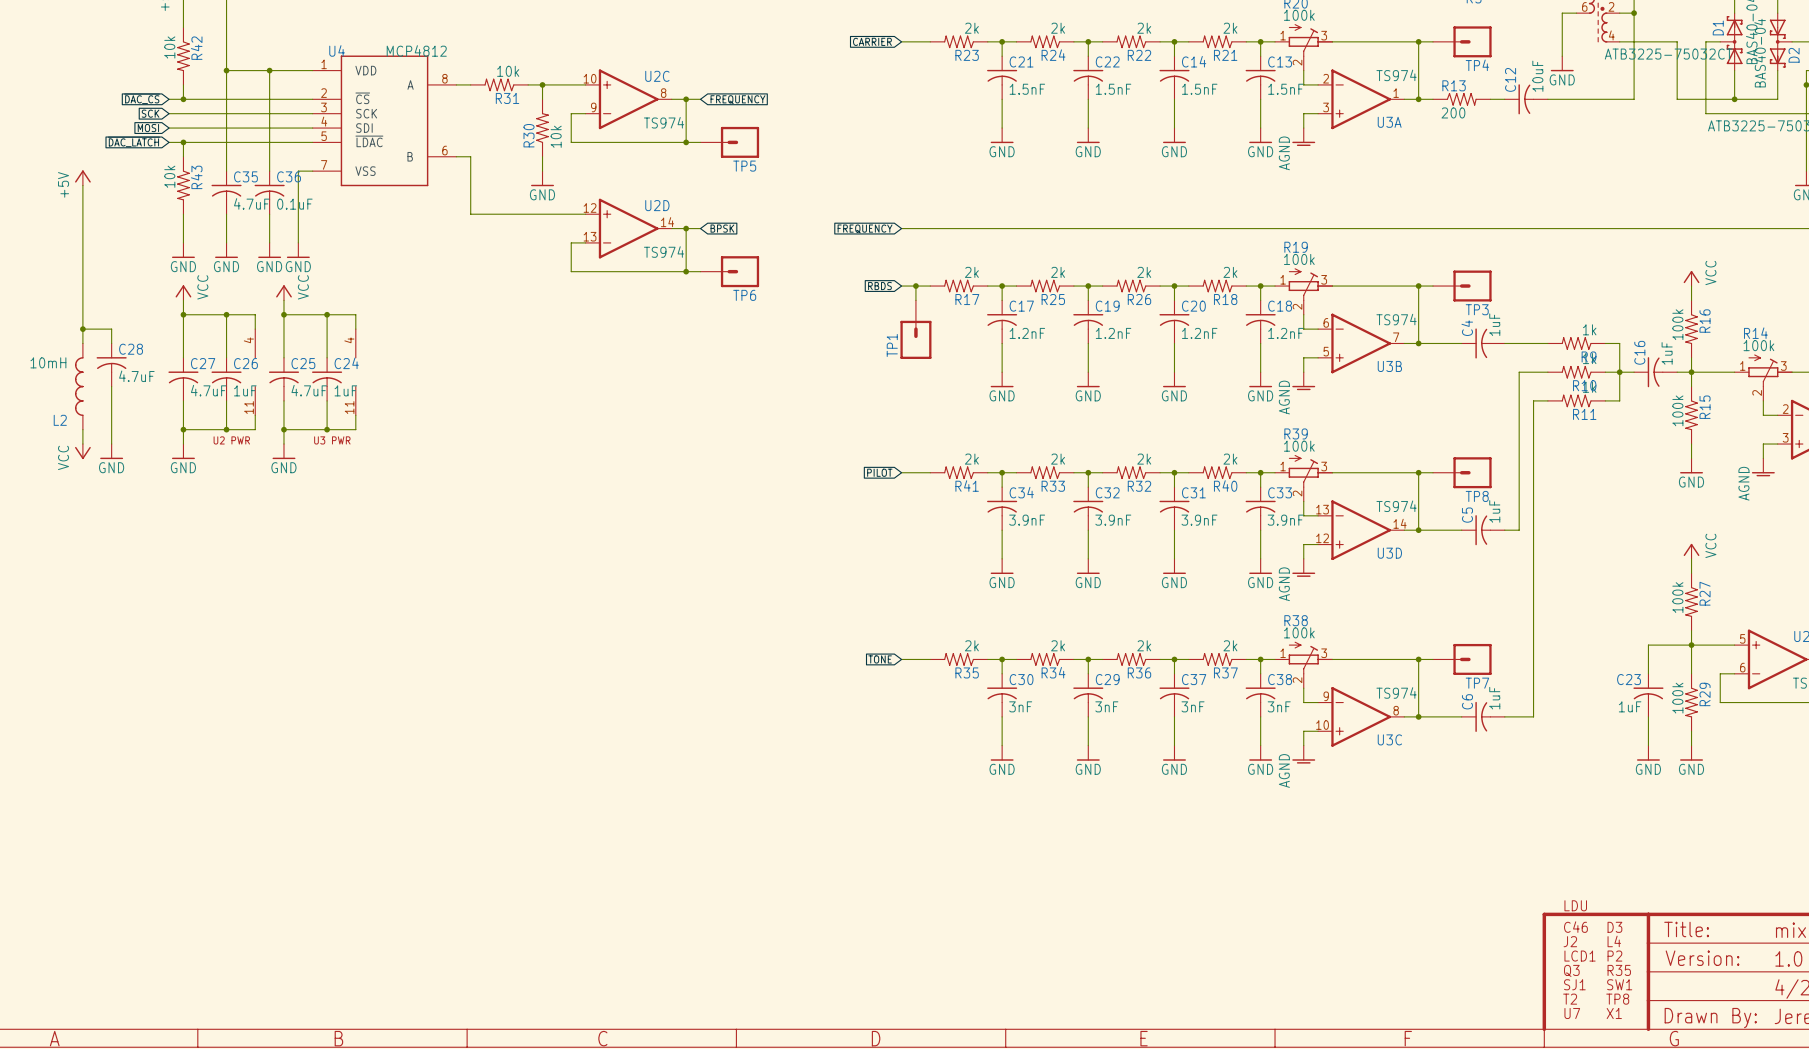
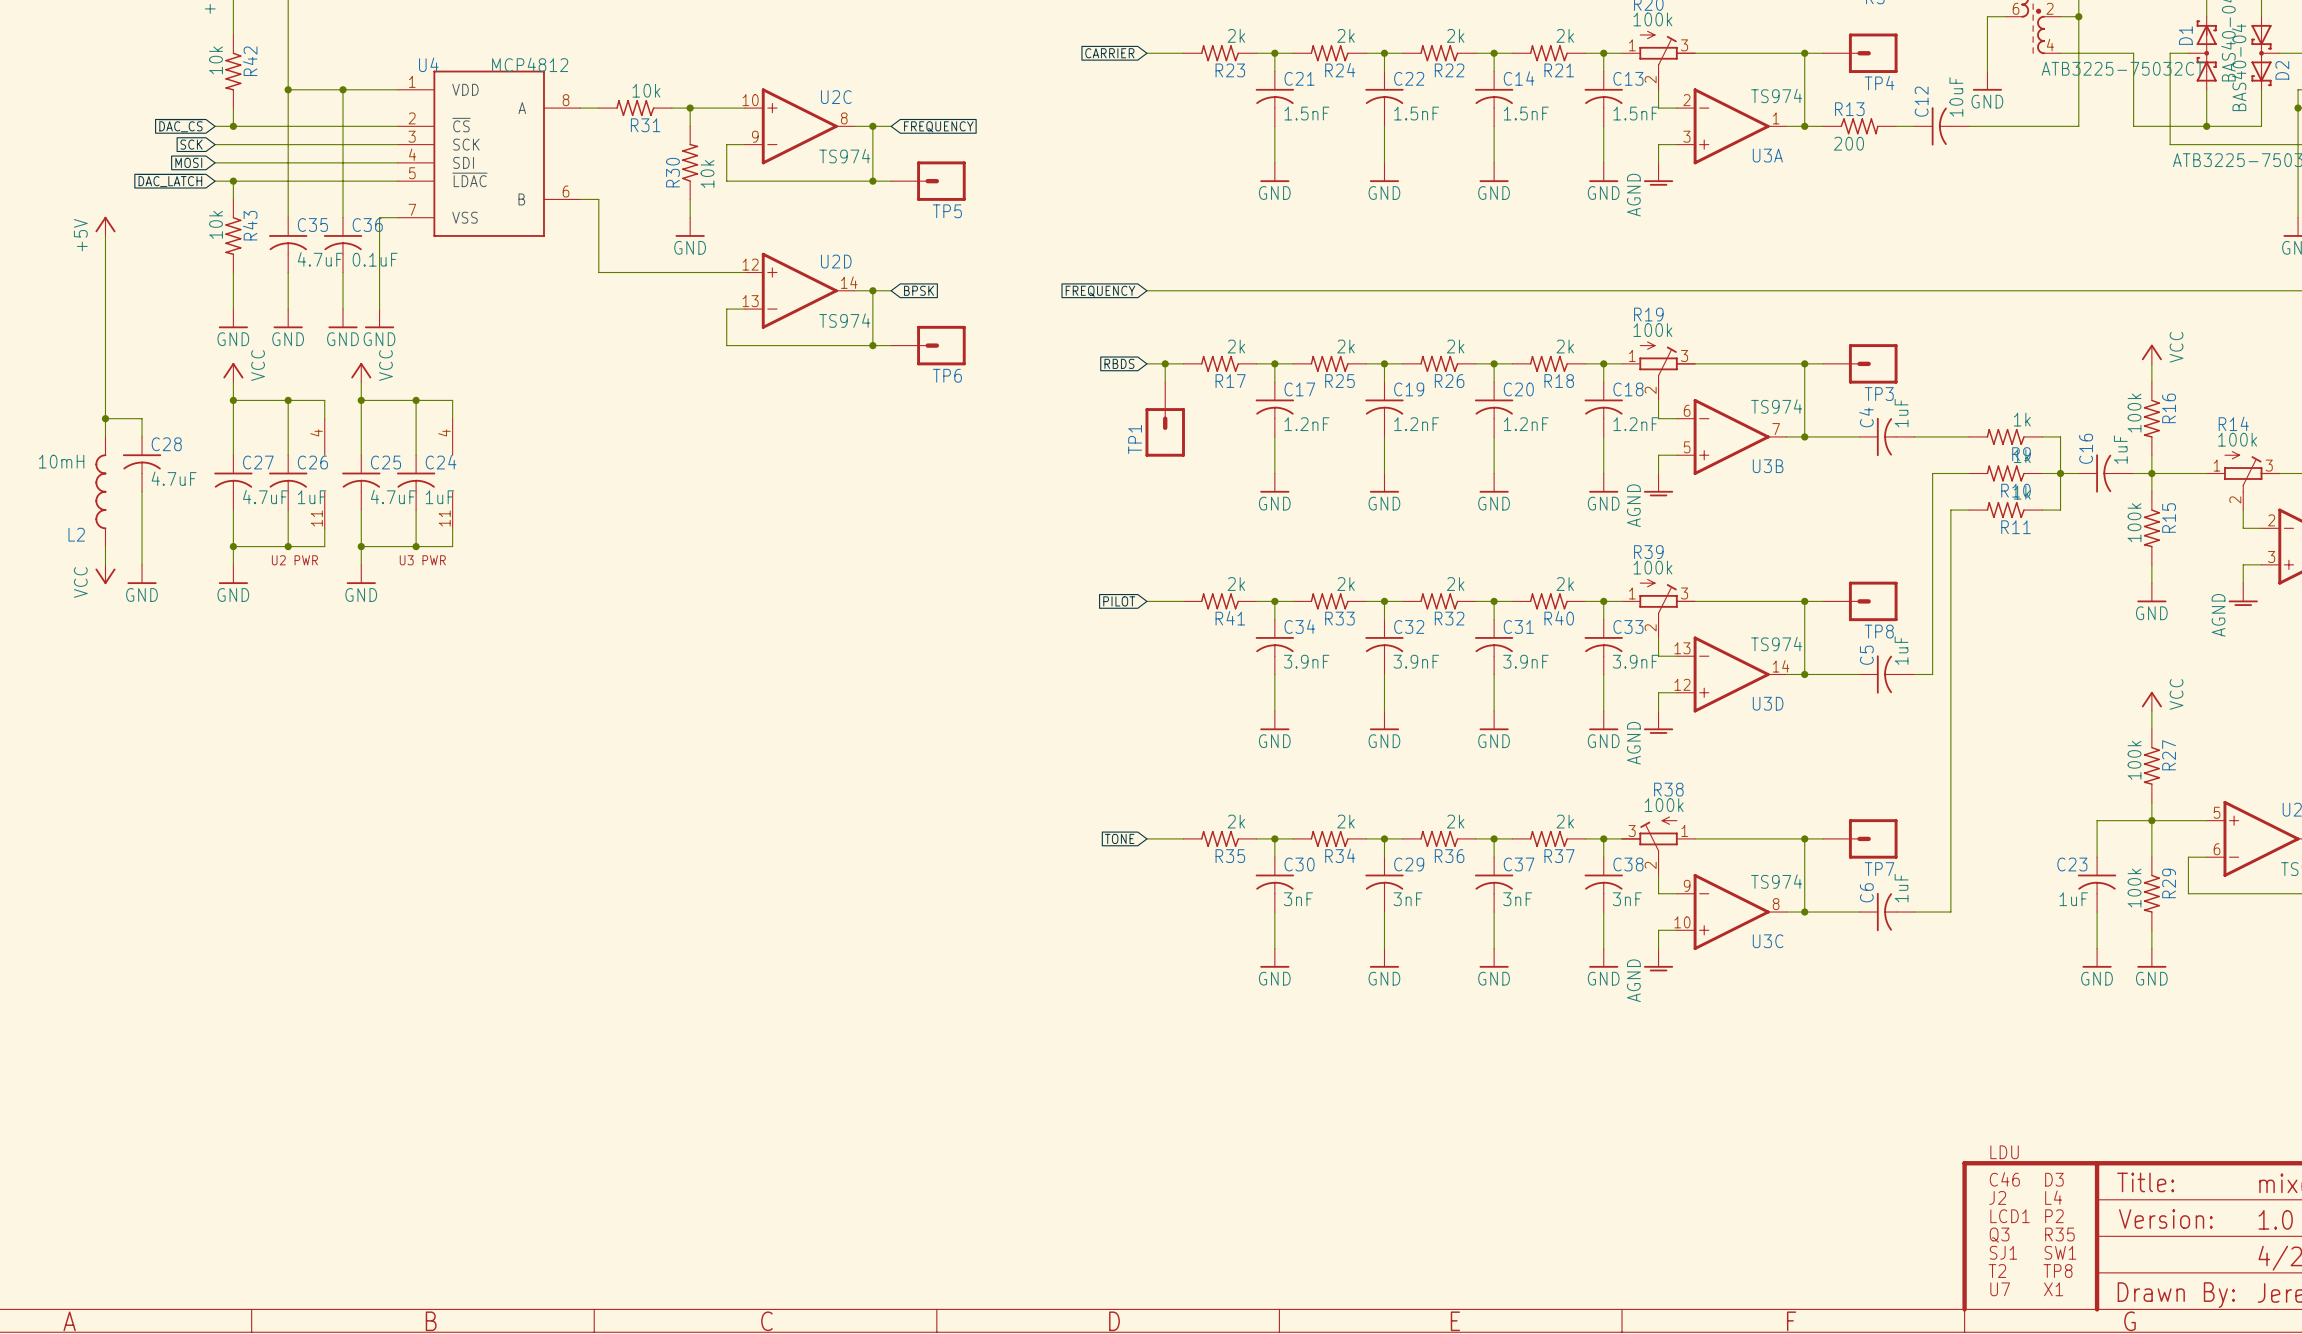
R38 flip: as is (1310, 658) -> left-right (1649, 837)

